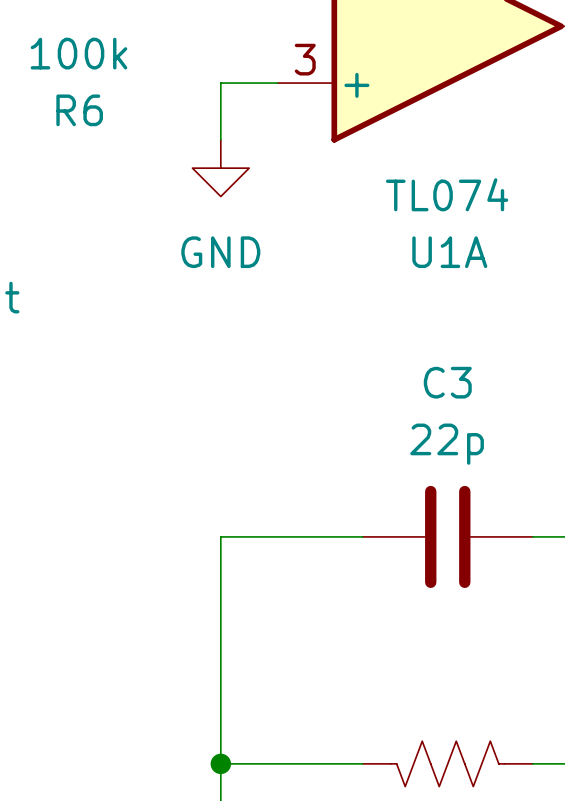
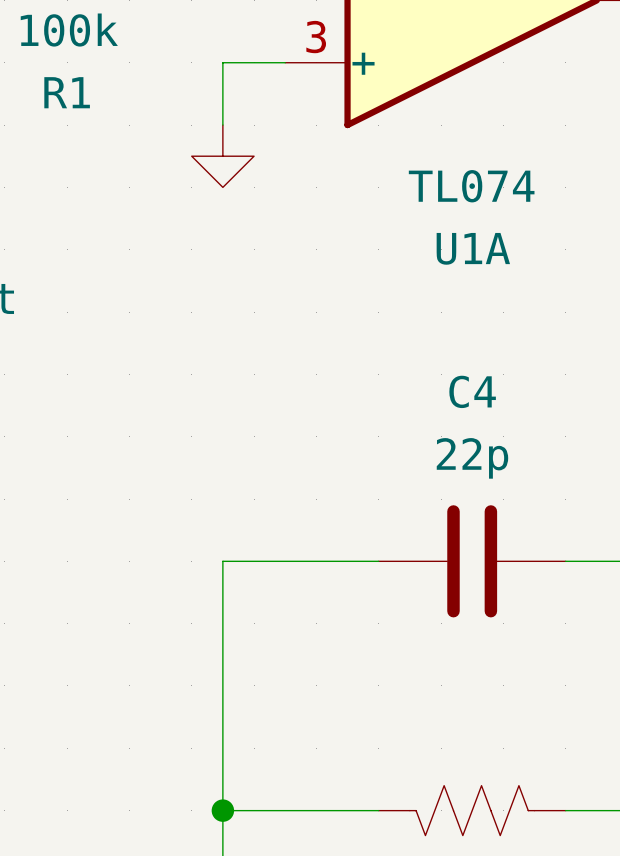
R6 name: R6 (79, 110) -> R1 (67, 92)
power symbol text: GND (220, 252) -> none
C3 name: C3 (447, 382) -> C4 (472, 391)

